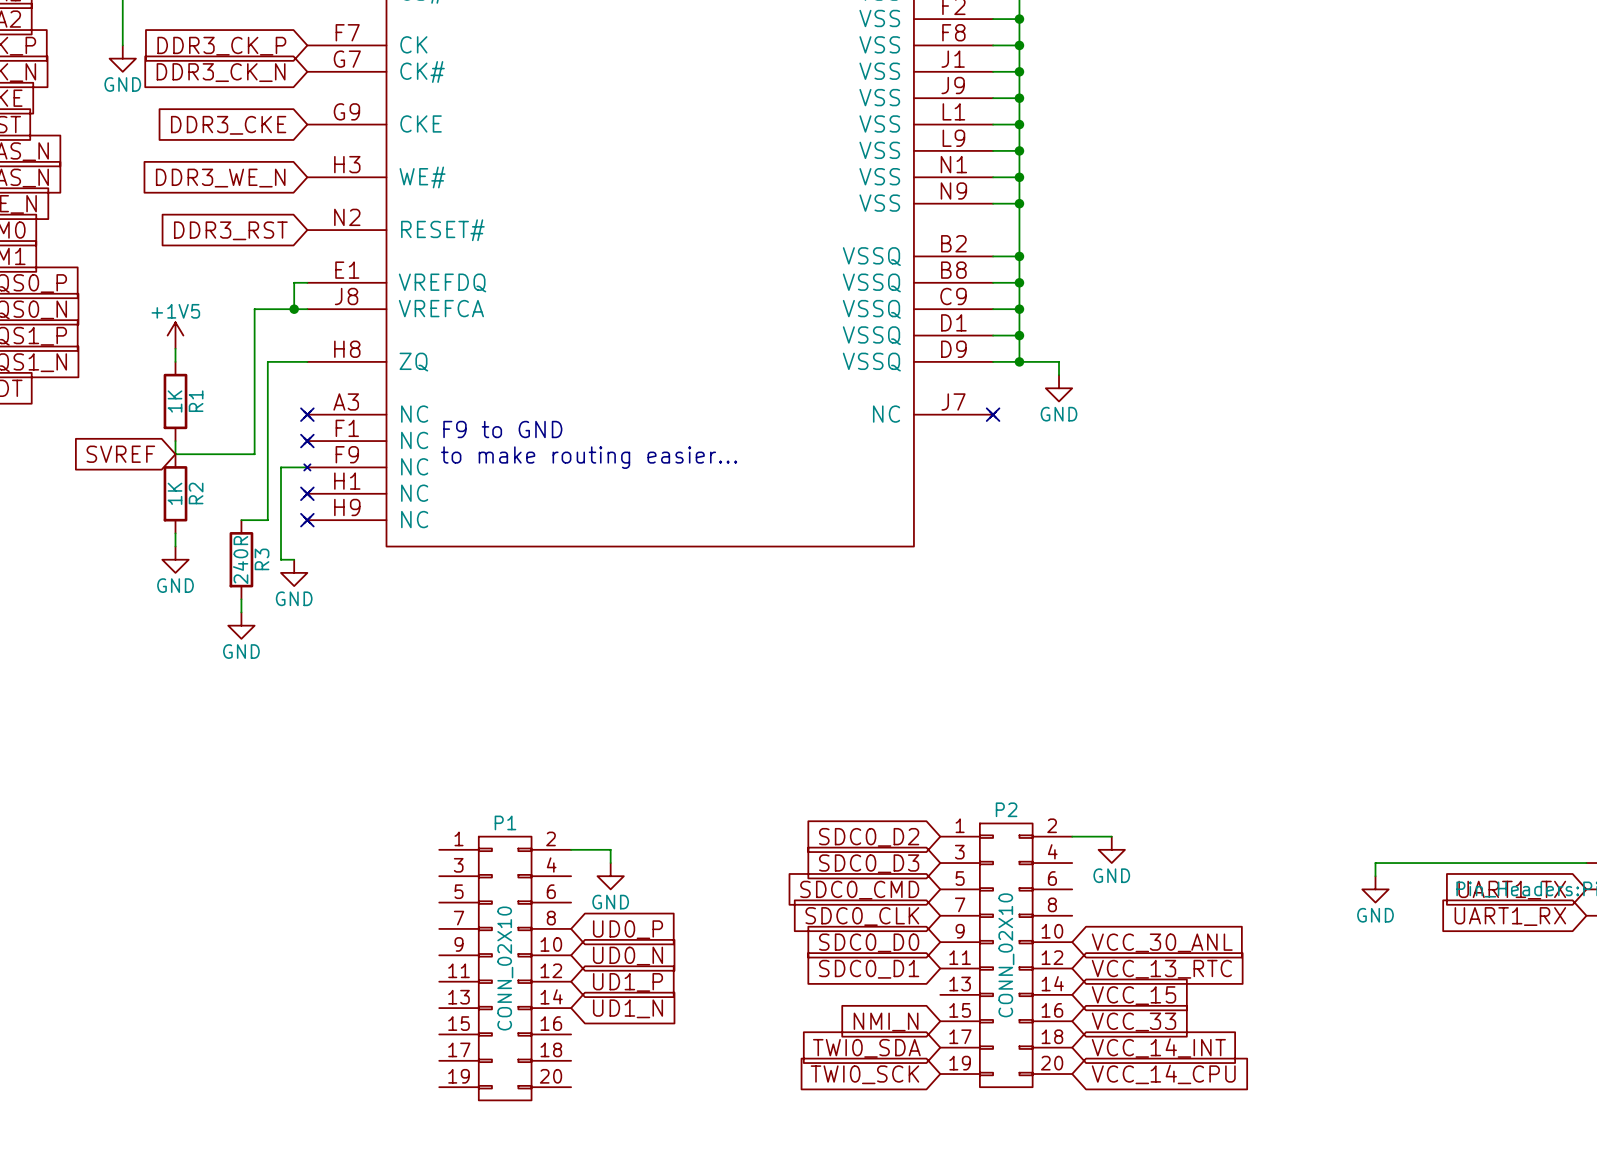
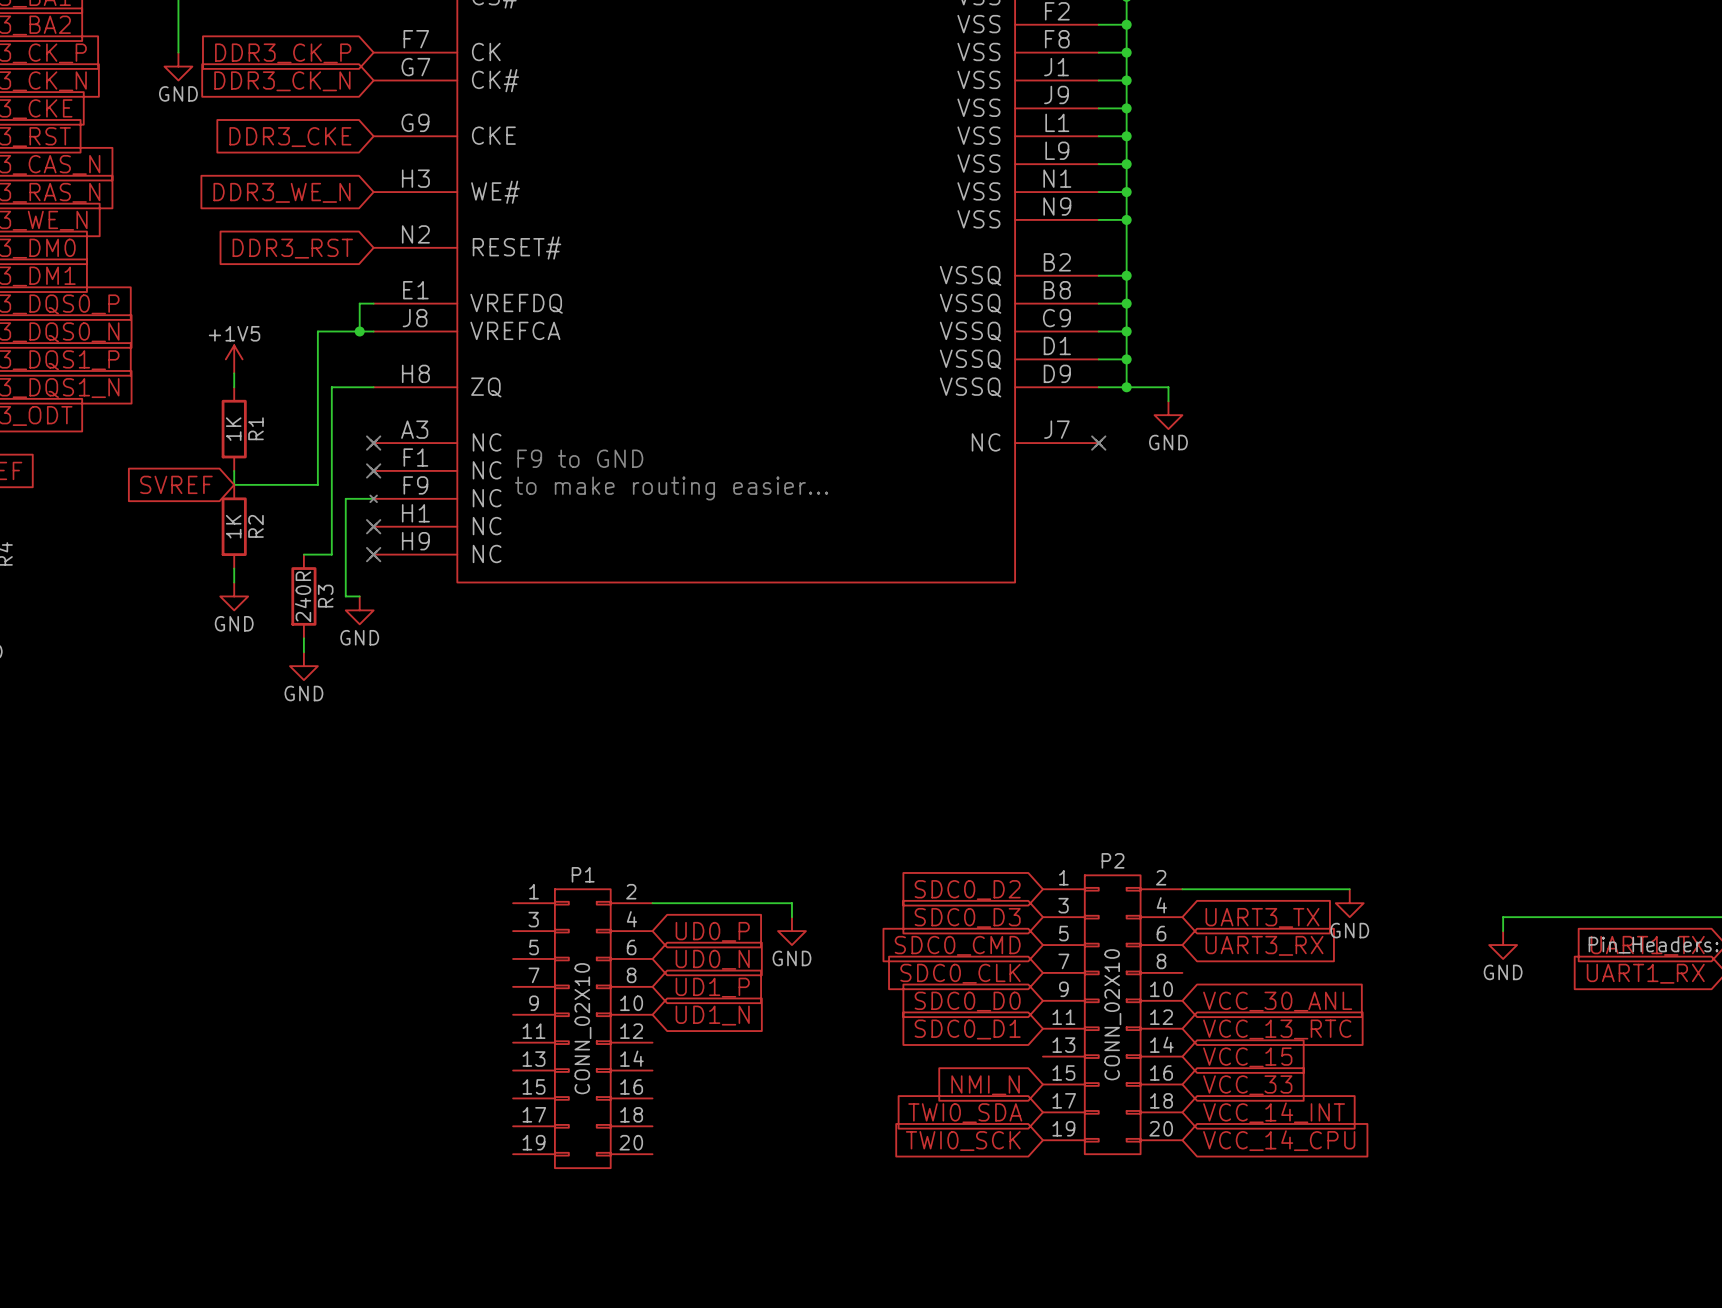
wire: none -> (1224, 889) (1349, 889)
wire: (610, 849) (610, 863) -> (694, 903) (791, 903) (791, 917)
power symbol position: GND (1111, 849) -> GND (1349, 903)
global label: none -> UART3_TX (1262, 917)
power symbol position: GND (610, 876) -> GND (791, 931)
global label: none -> UD0_P (712, 931)
global label: none -> UART3_RX (1264, 945)
global label: none -> UD0_N (712, 959)
global label: UD0_P (628, 929) -> UD1_P (712, 987)
global label: UD0_N (628, 956) -> UD1_N (712, 1015)
global label: UD1_P (628, 982) -> none
global label: UD1_N (628, 1008) -> none

